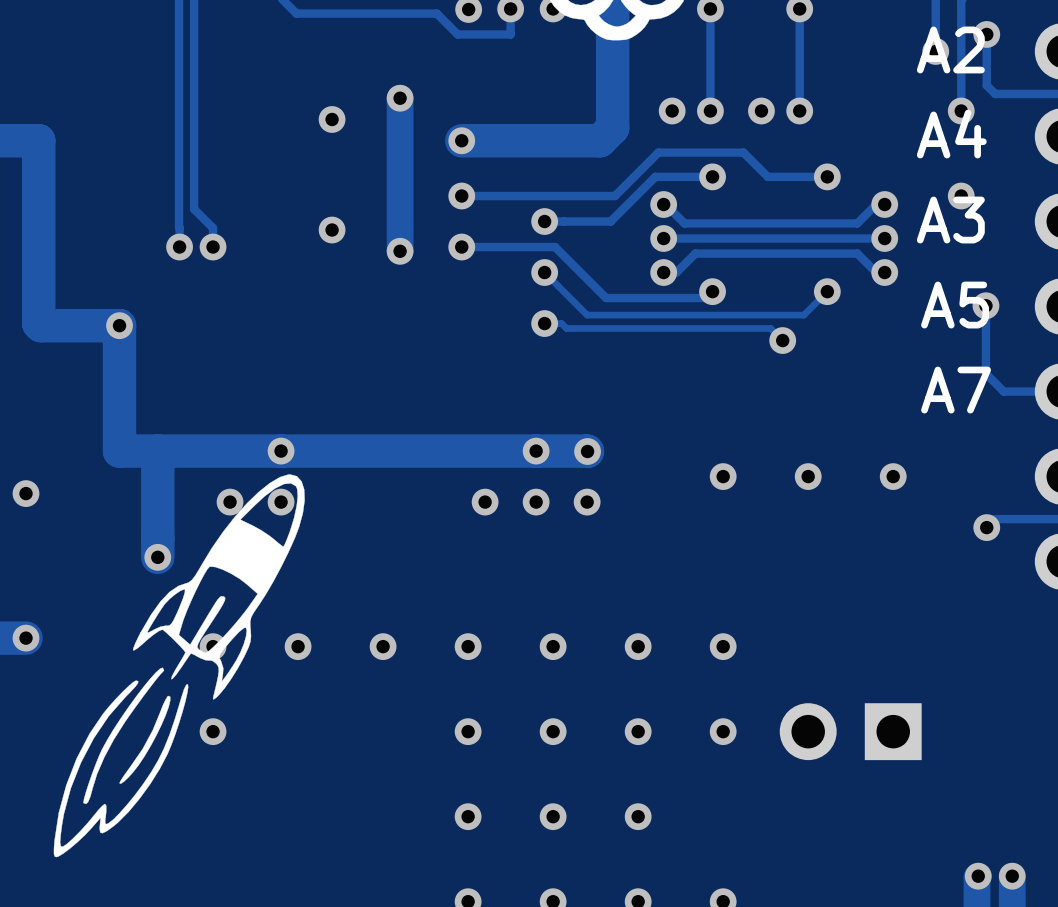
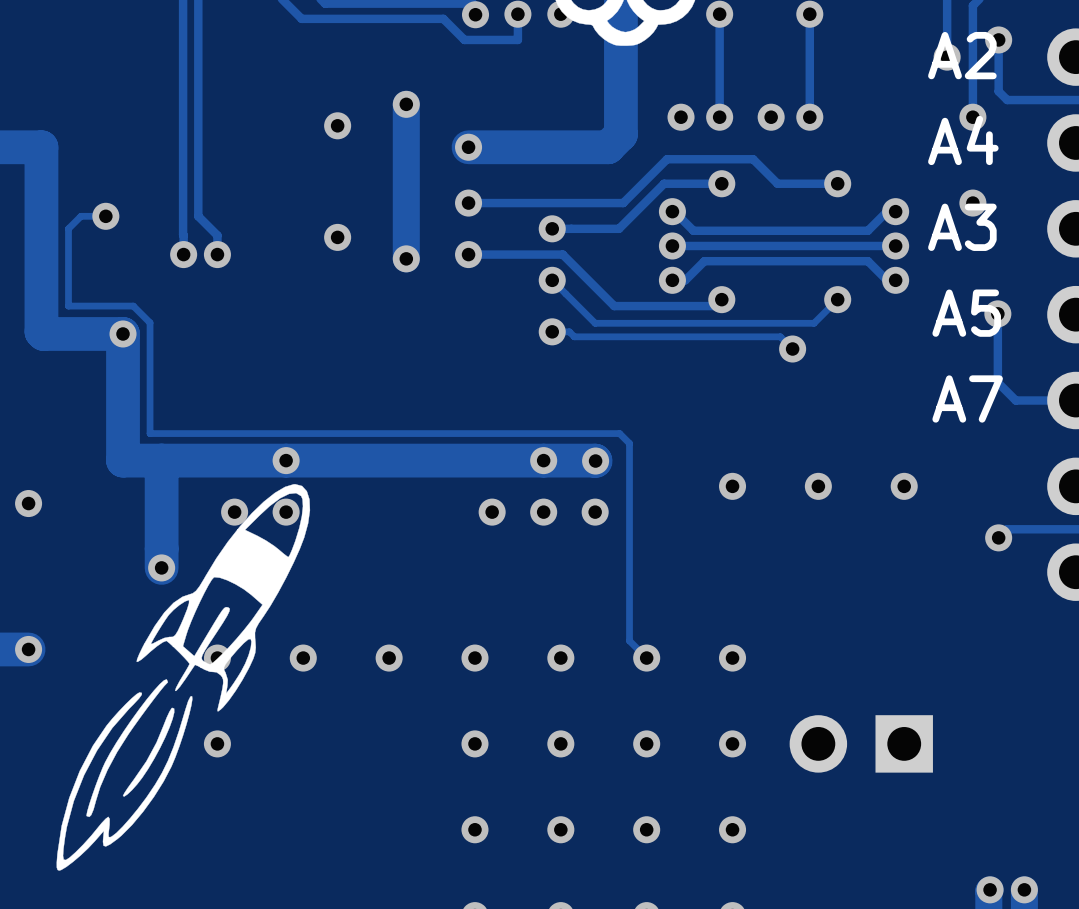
track: none -> (105, 216) (80, 216) (68, 228) (68, 306) (133, 306) (150, 322) (150, 433) (619, 433) (629, 443) (629, 640) (646, 658)
via: none -> (105, 216)
via: none -> (732, 829)

